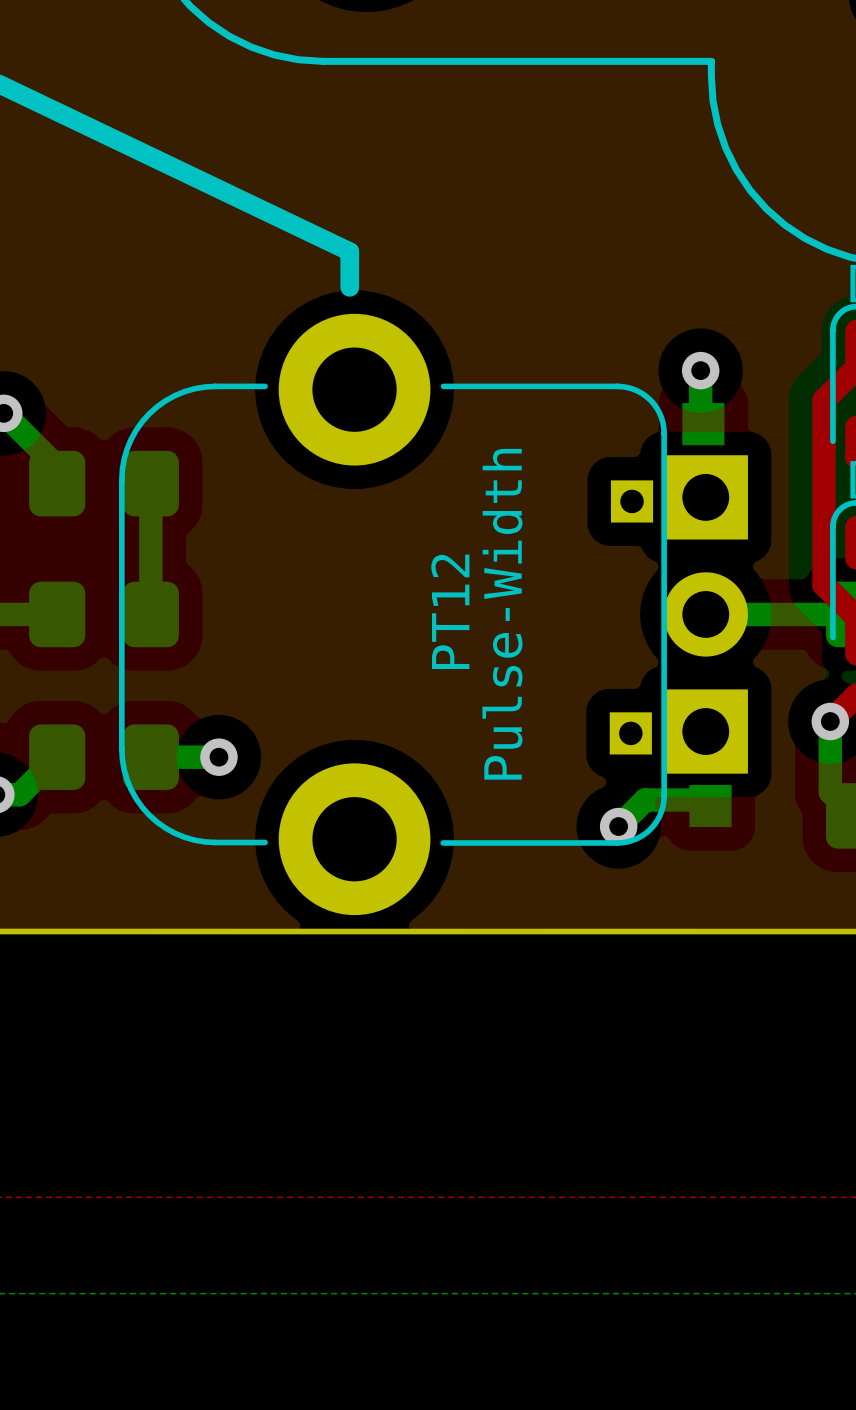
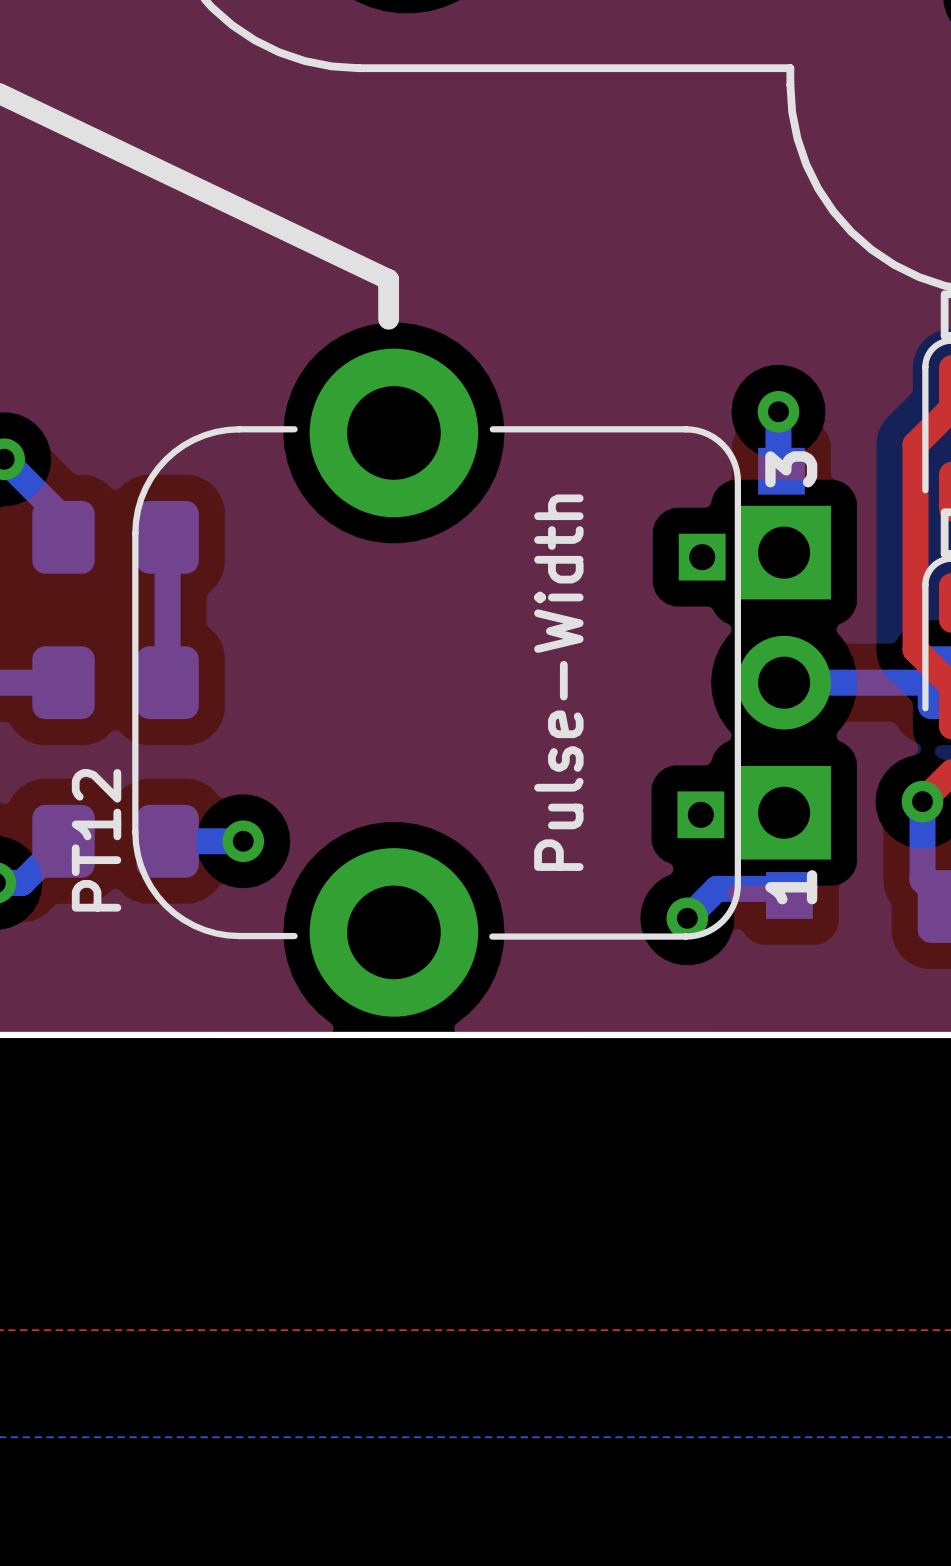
PT12 text: none -> 3 (791, 469)
PT12 name position: PT12 (450, 611) -> PT12 (96, 840)
PT12 text: none -> 1 (791, 887)

